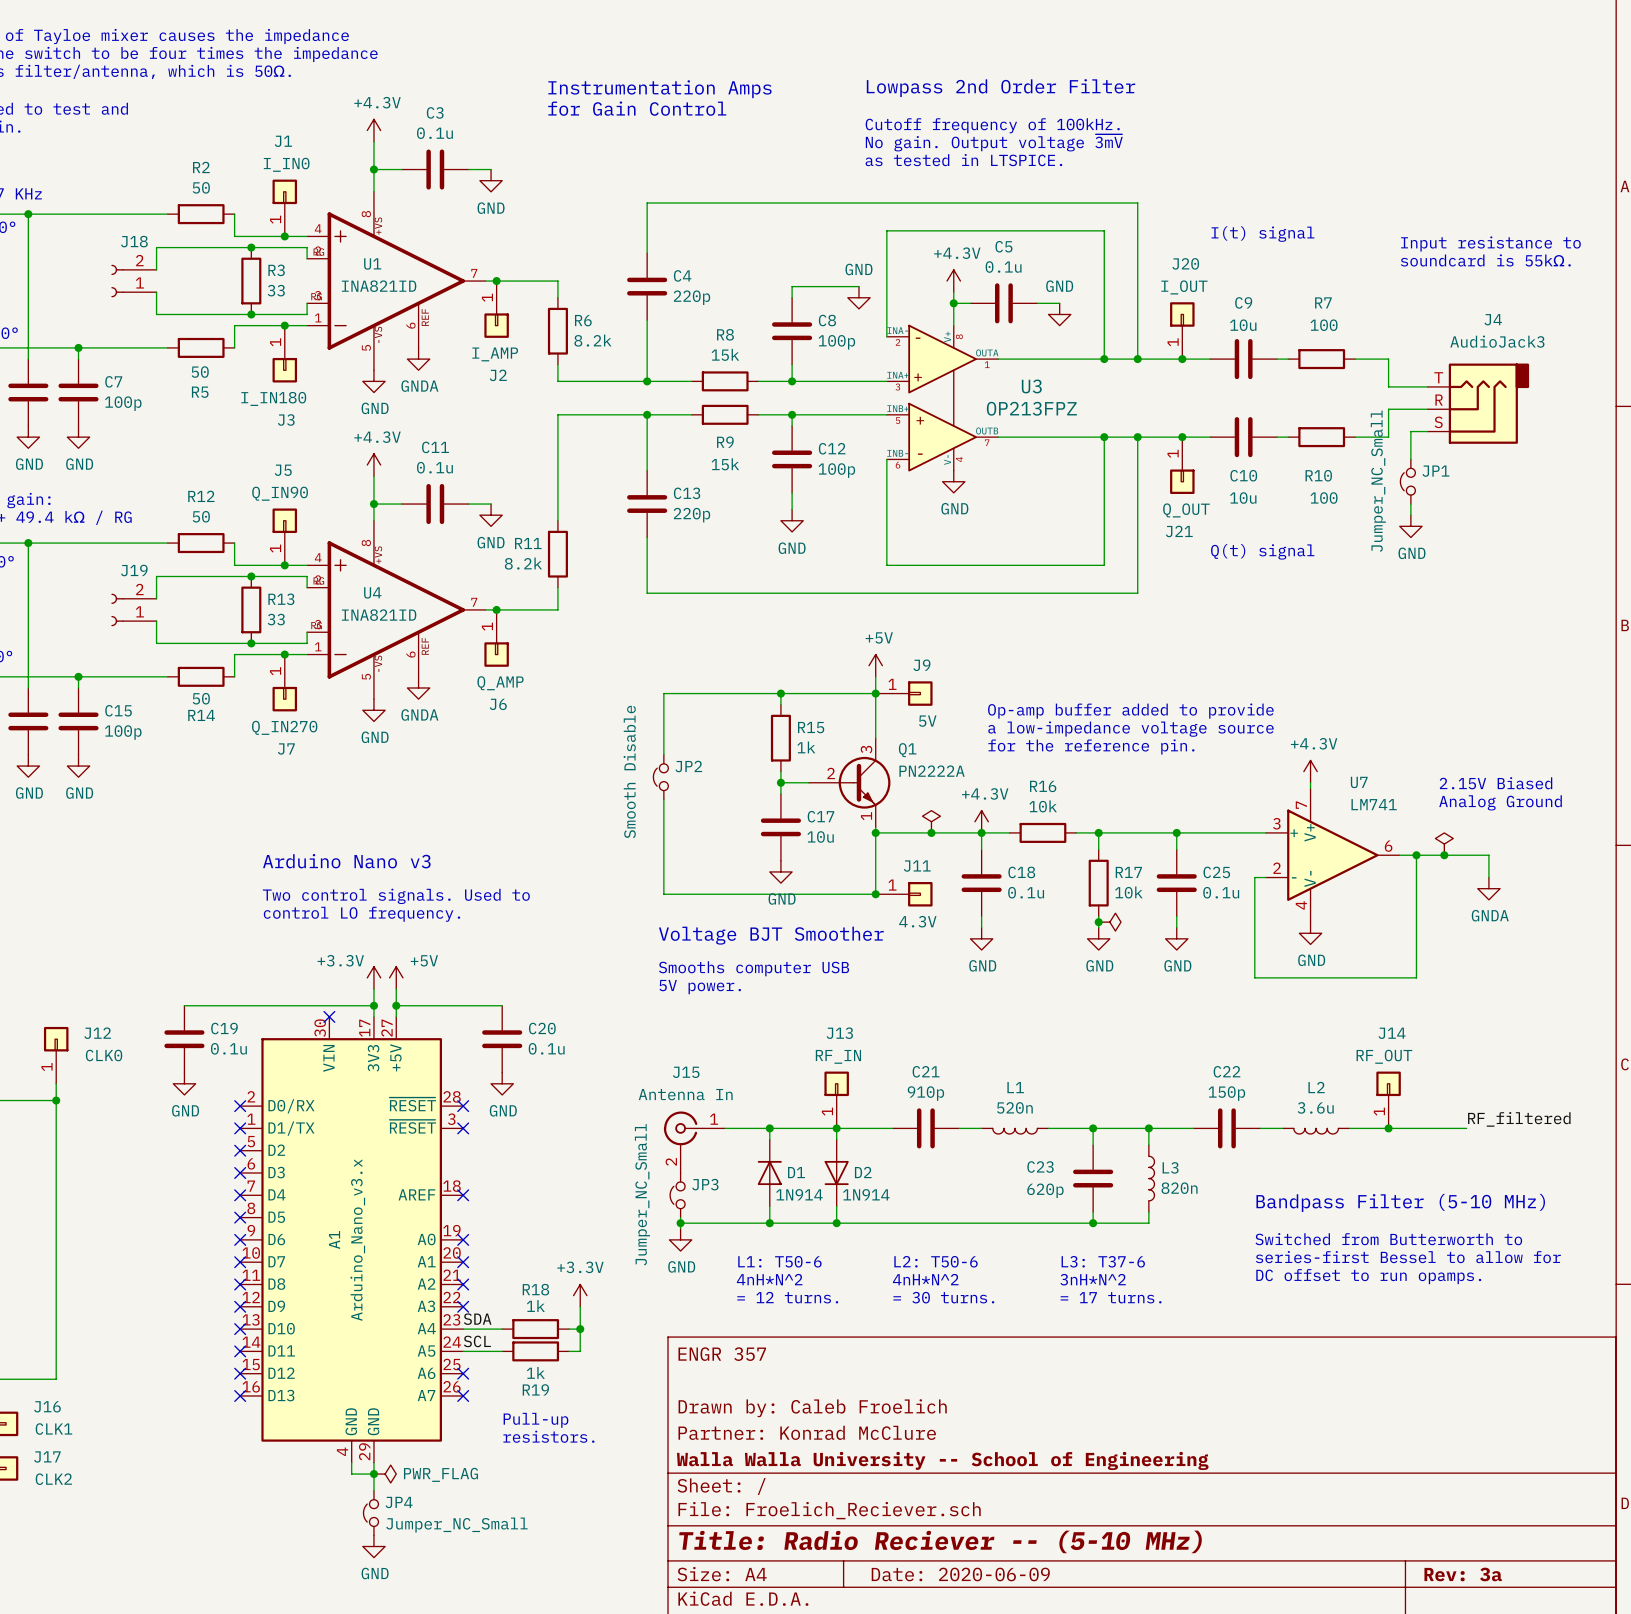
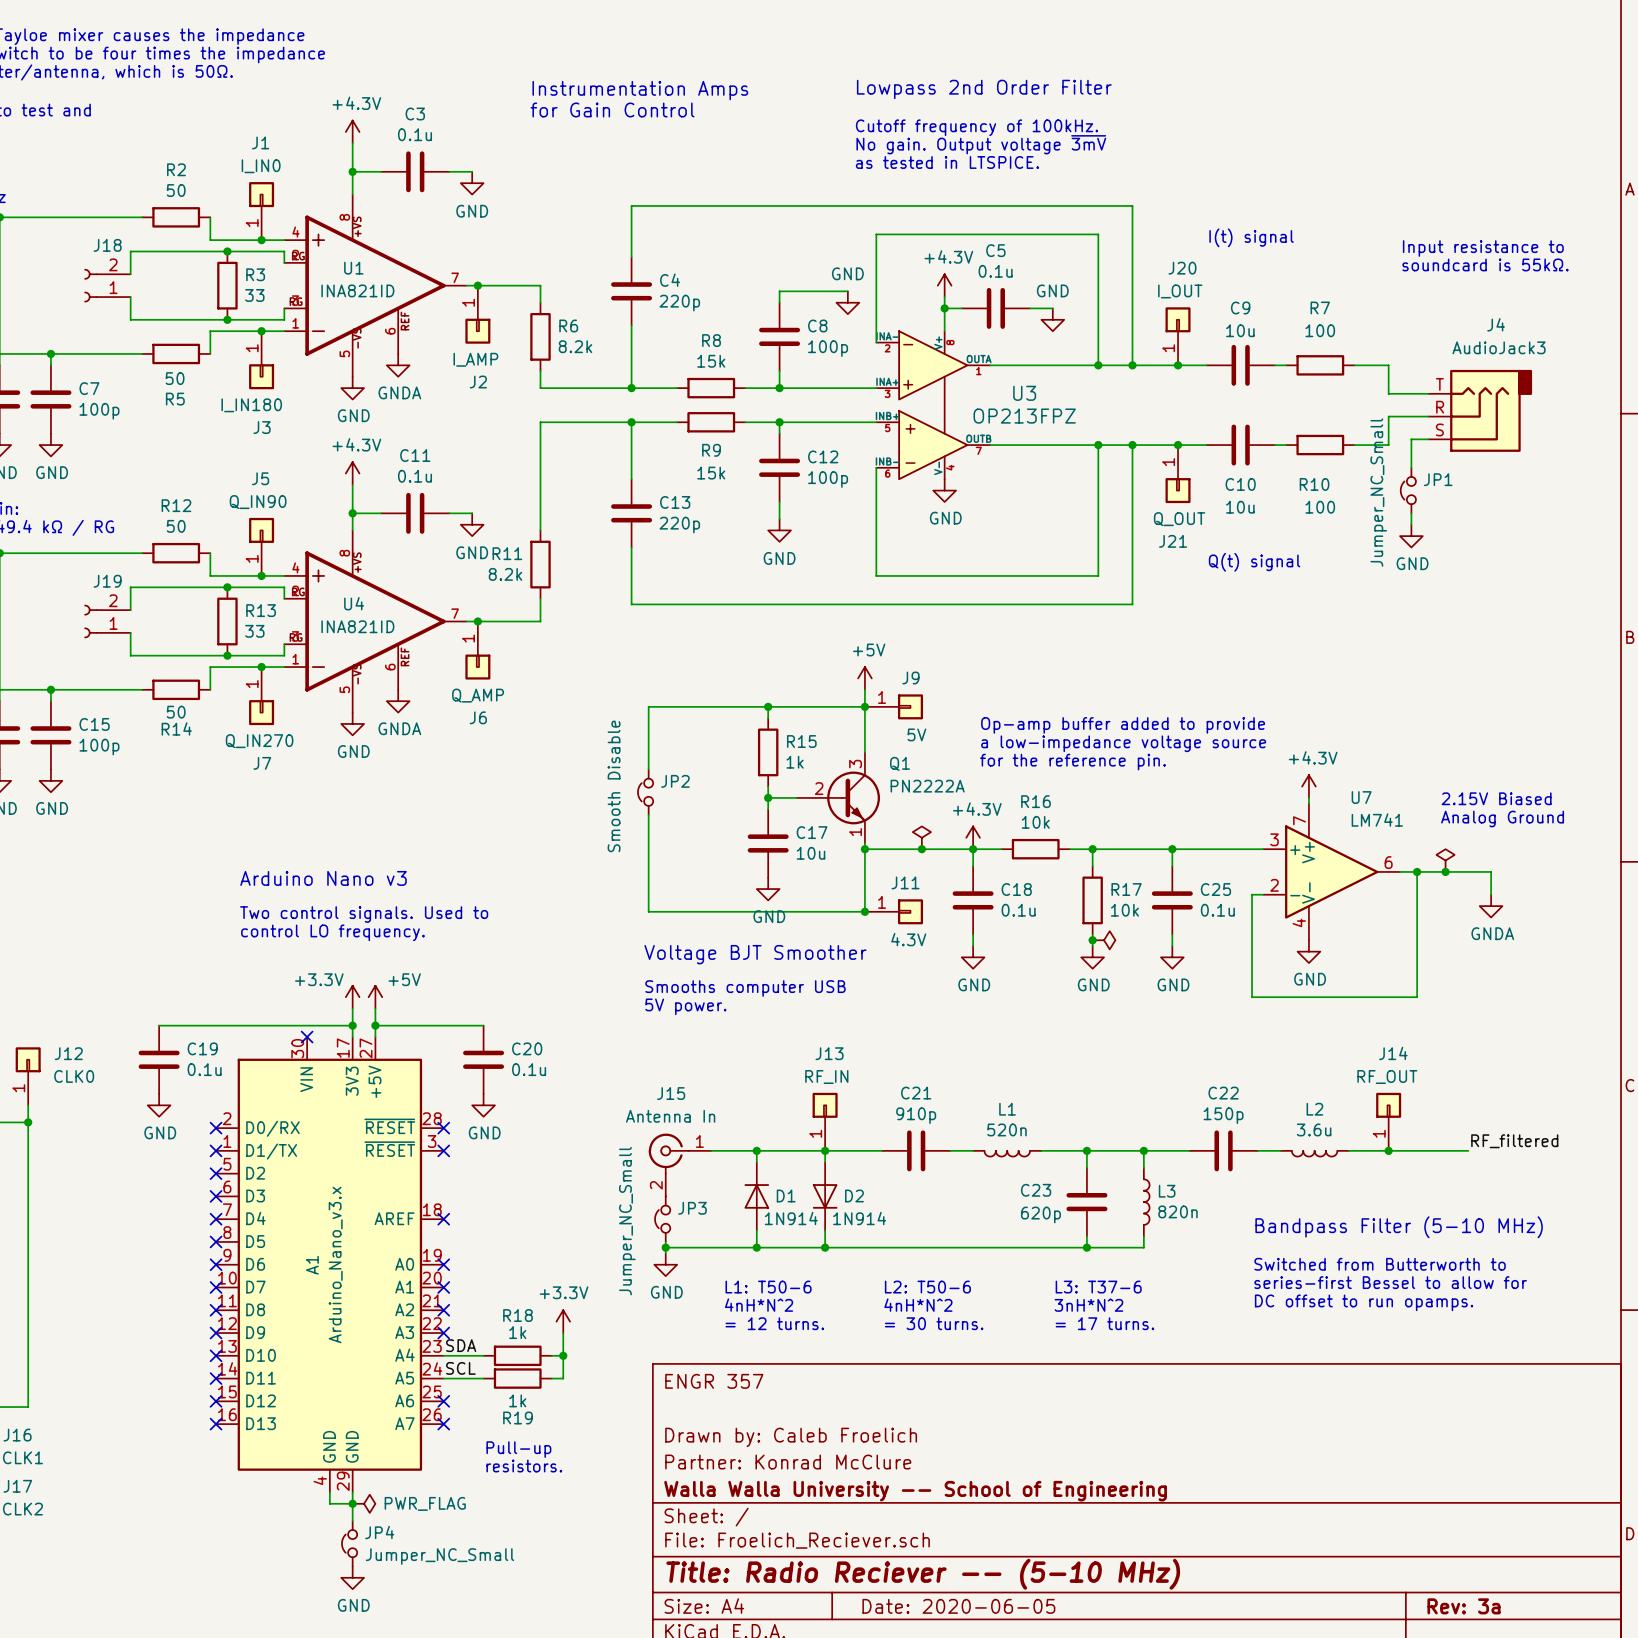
title block: Date: 2020-06-09 (960, 1574) -> Date: 2020-06-05 (958, 1606)

